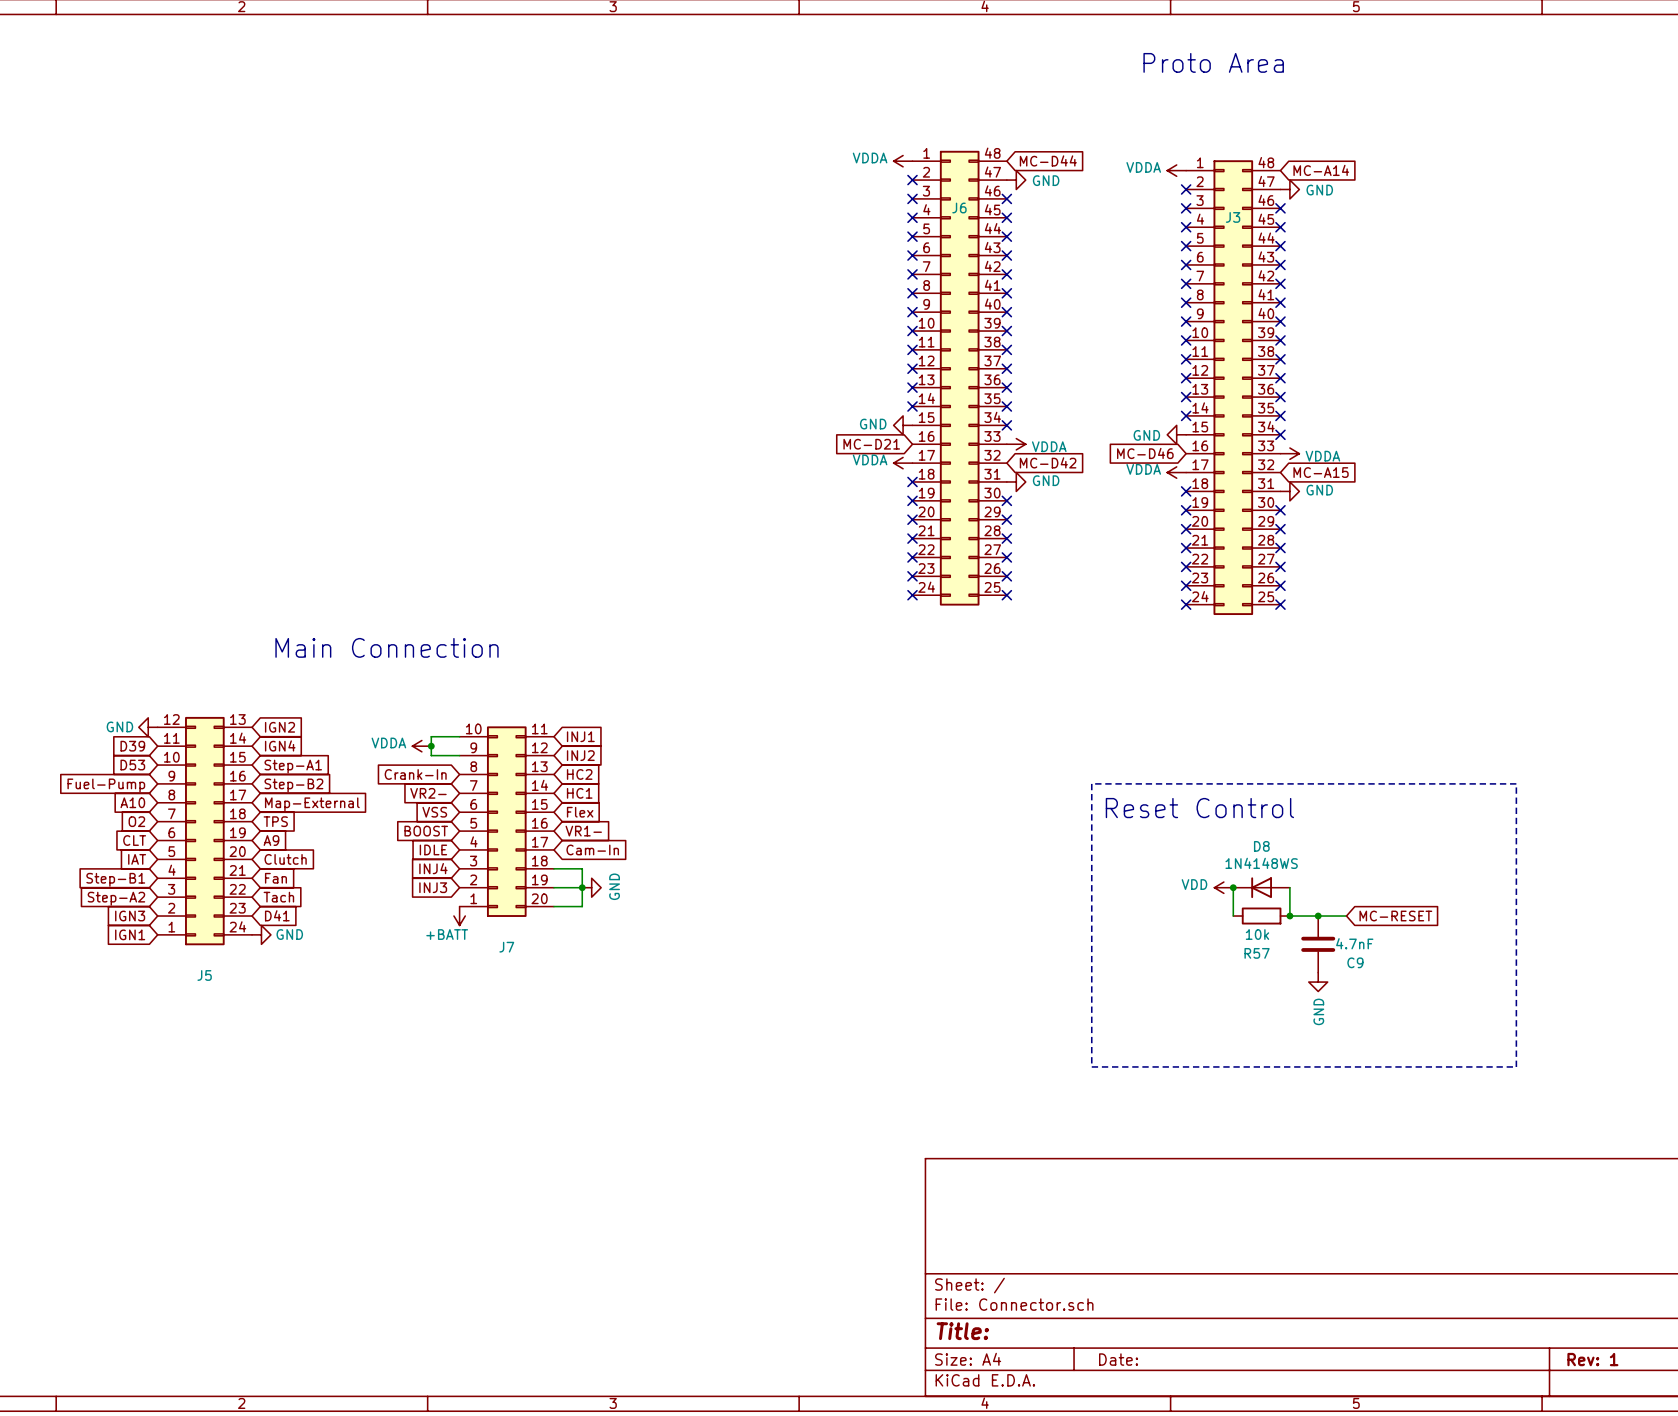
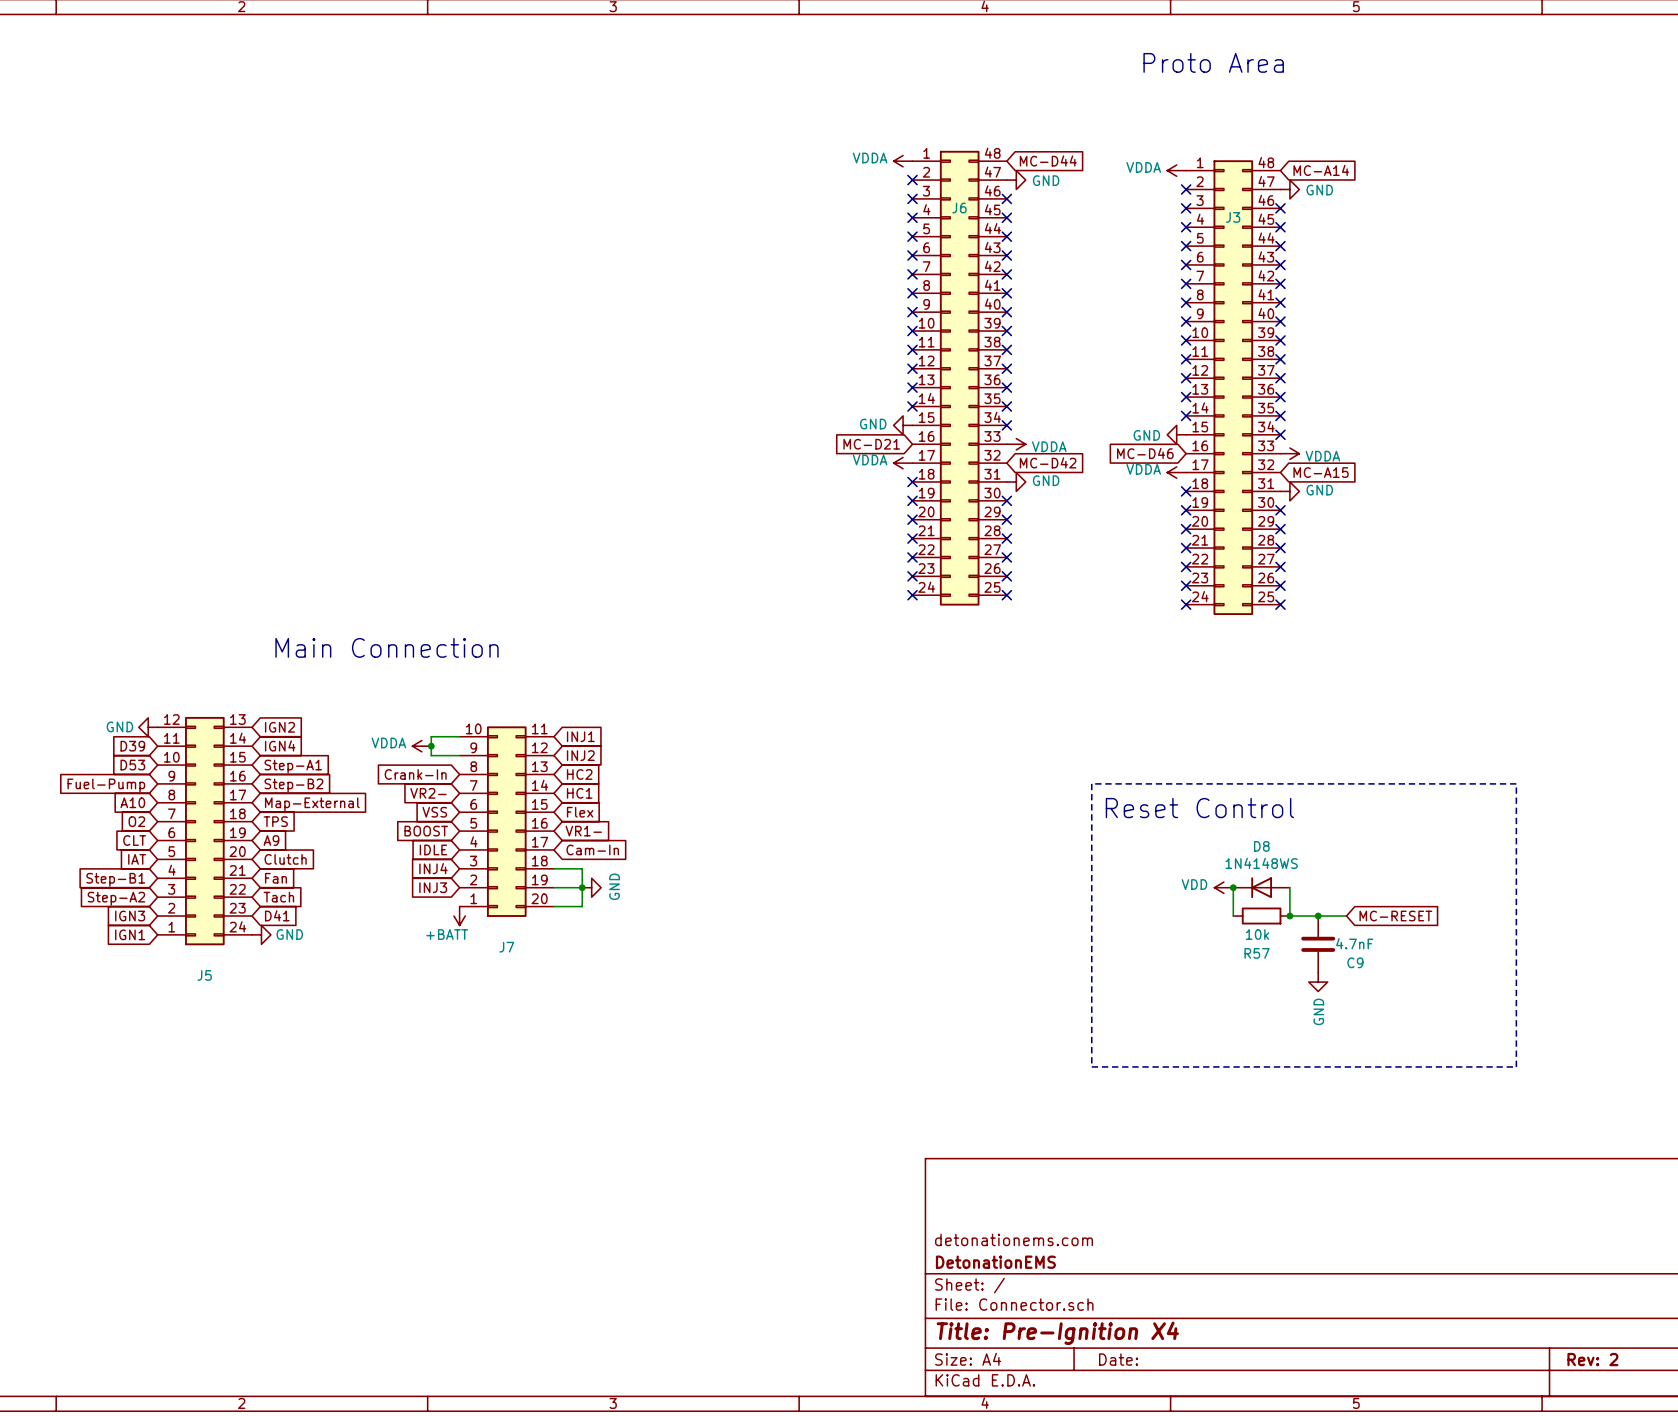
title block: none -> detonationems.com (1014, 1239)
title block: none -> DetonationEMS (995, 1262)
title block: Title: (962, 1331) -> Title: Pre-Ignition X4 (1057, 1333)
title block: Rev: 1 (1592, 1359) -> Rev: 2 (1592, 1359)

